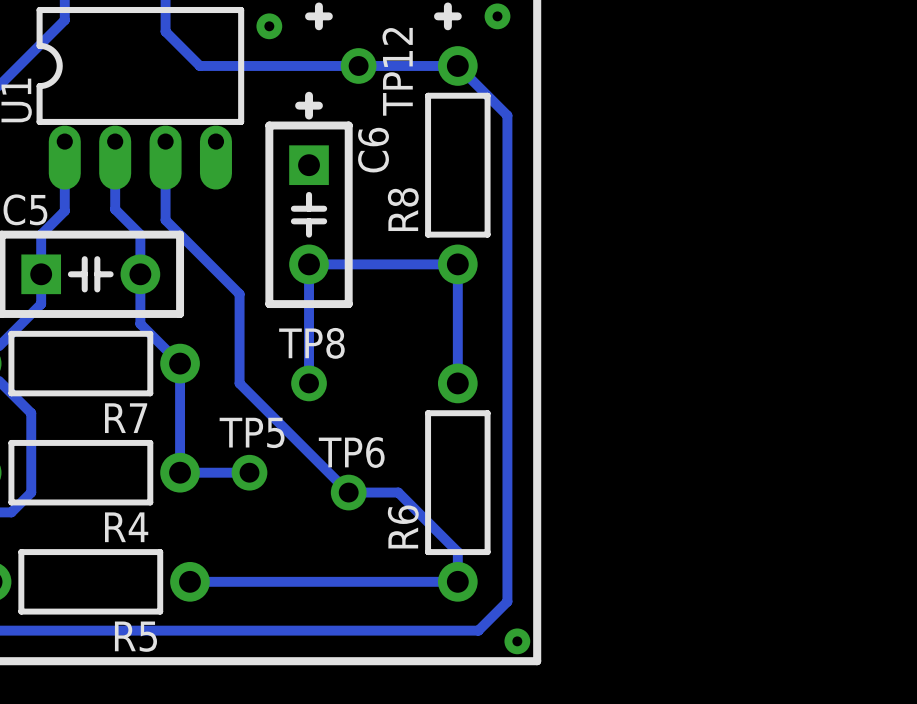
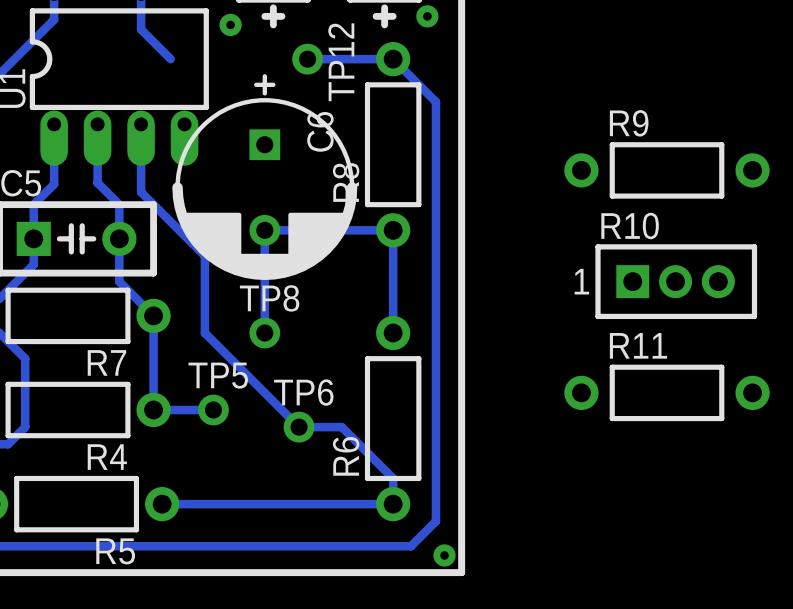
bottom track: (199, 65) (358, 65) -> none
C6 footprint: [265, 91, 353, 309] -> [172, 74, 358, 281]
R9: none -> (667, 170)
R10: none -> (676, 281)
R11: none -> (667, 392)

